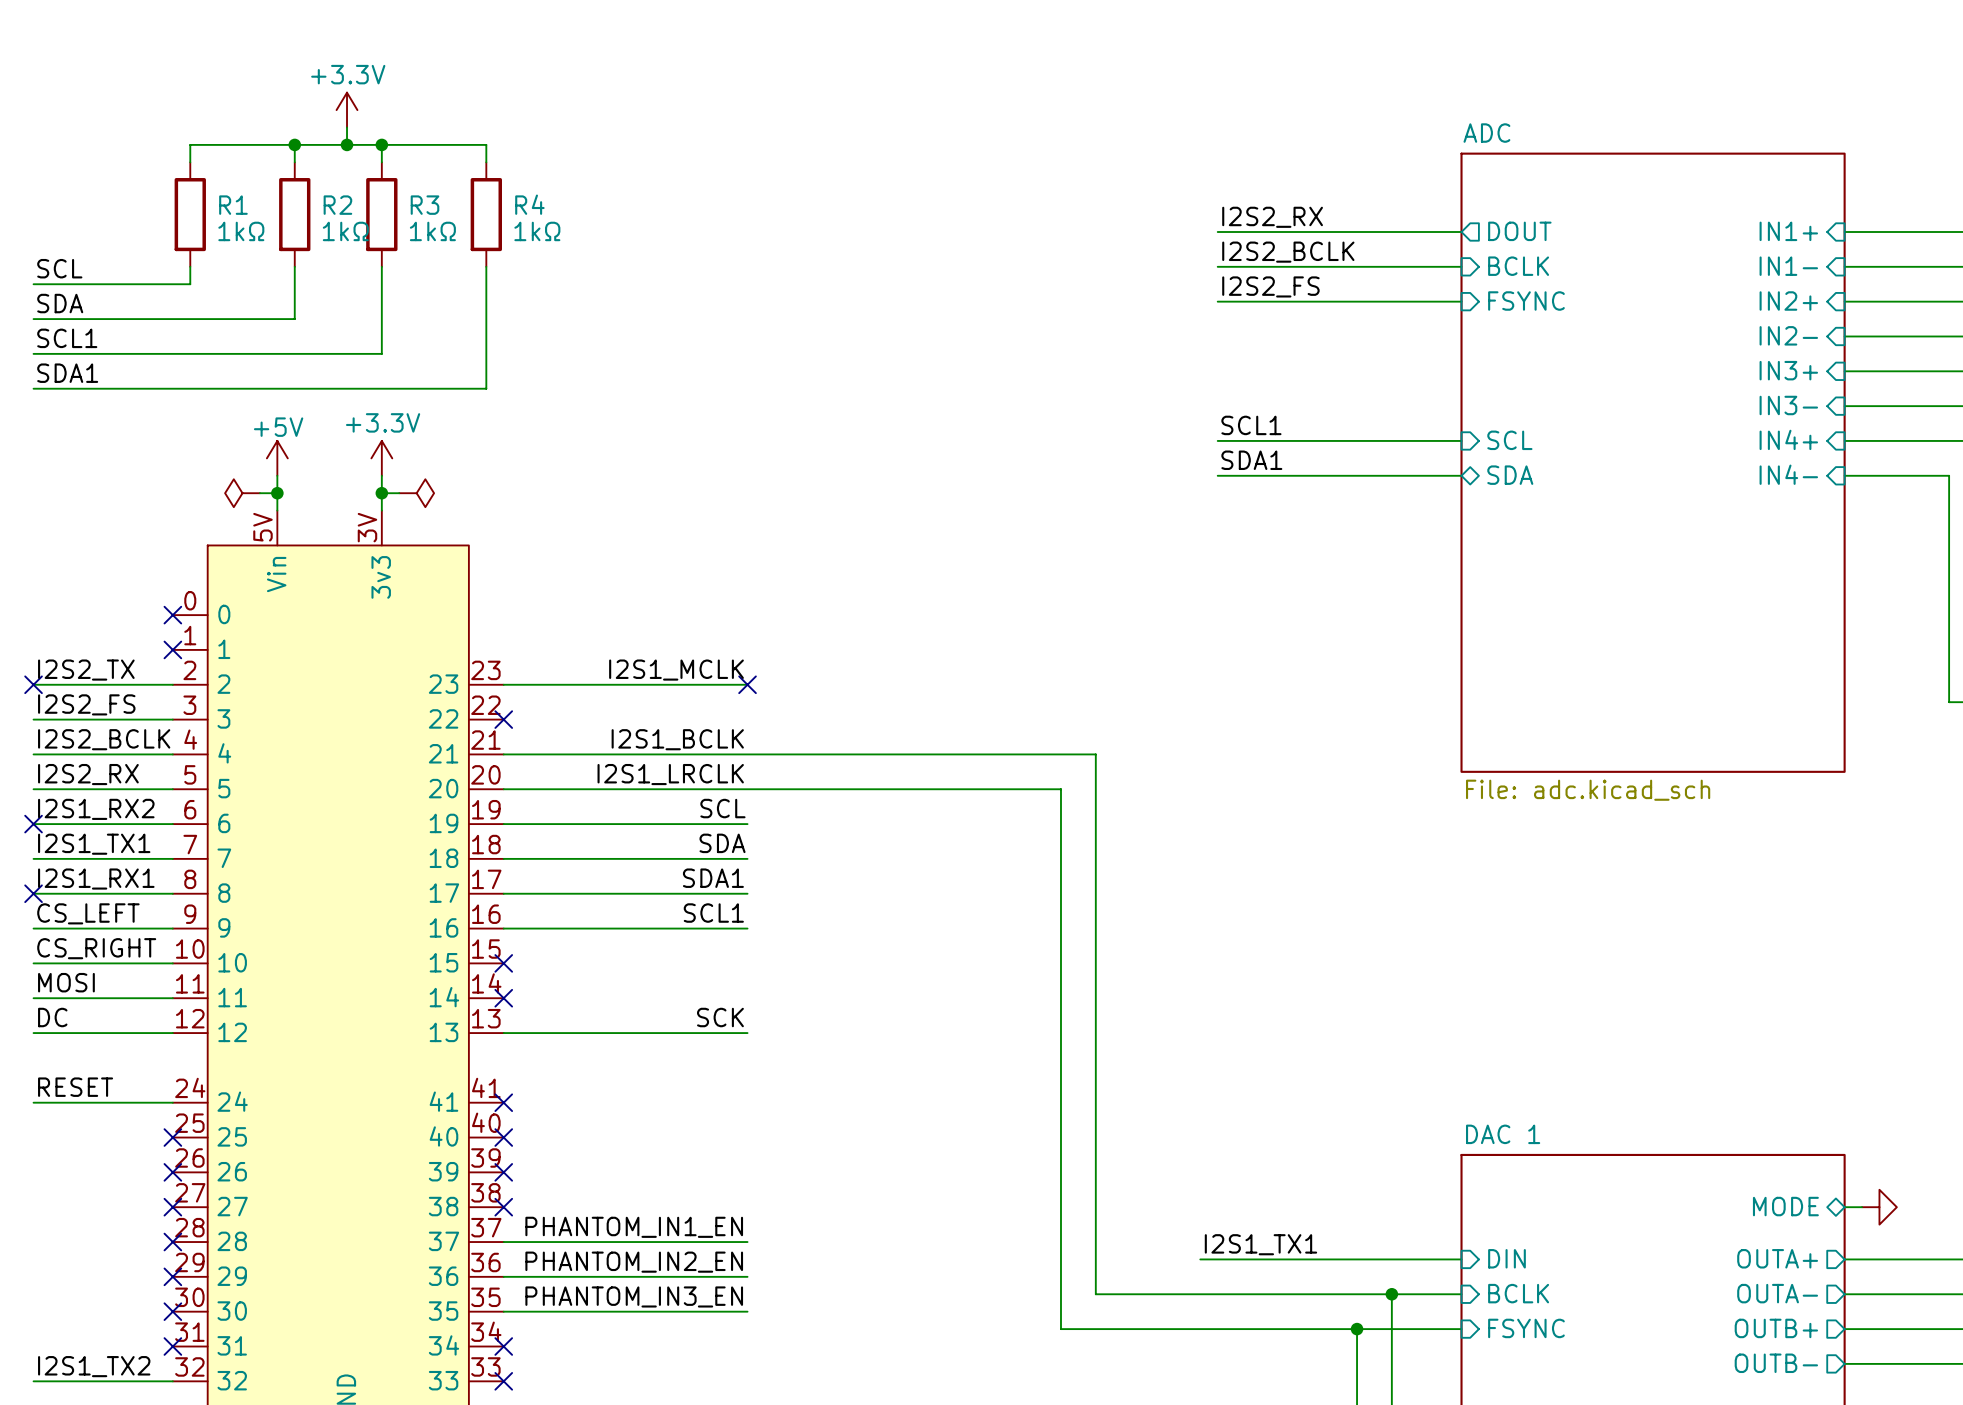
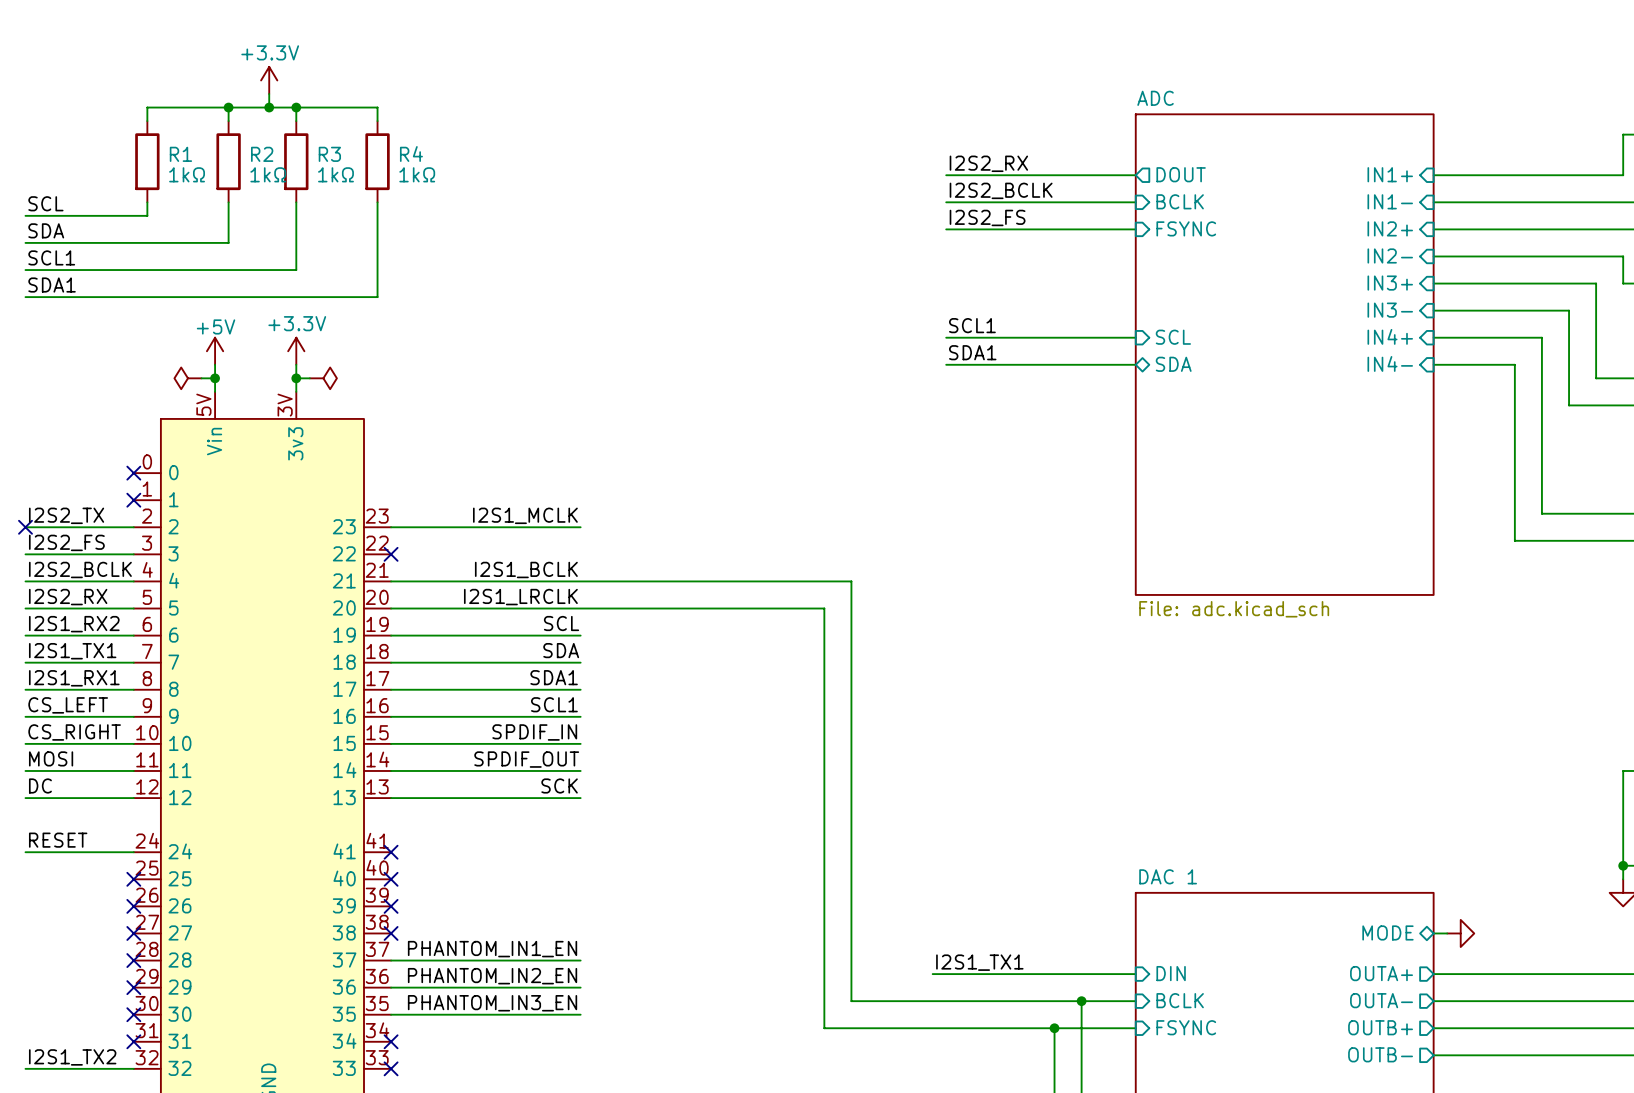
no-connect mark: (747, 684) -> none
no-connect mark: (33, 824) -> none
no-connect mark: (33, 893) -> none
label: none -> SPDIF_IN (534, 732)
wire: none -> (391, 743) (580, 743)
no-connect mark: (503, 963) -> none
label: none -> SPDIF_OUT (526, 759)
wire: none -> (391, 770) (580, 770)
no-connect mark: (503, 998) -> none

